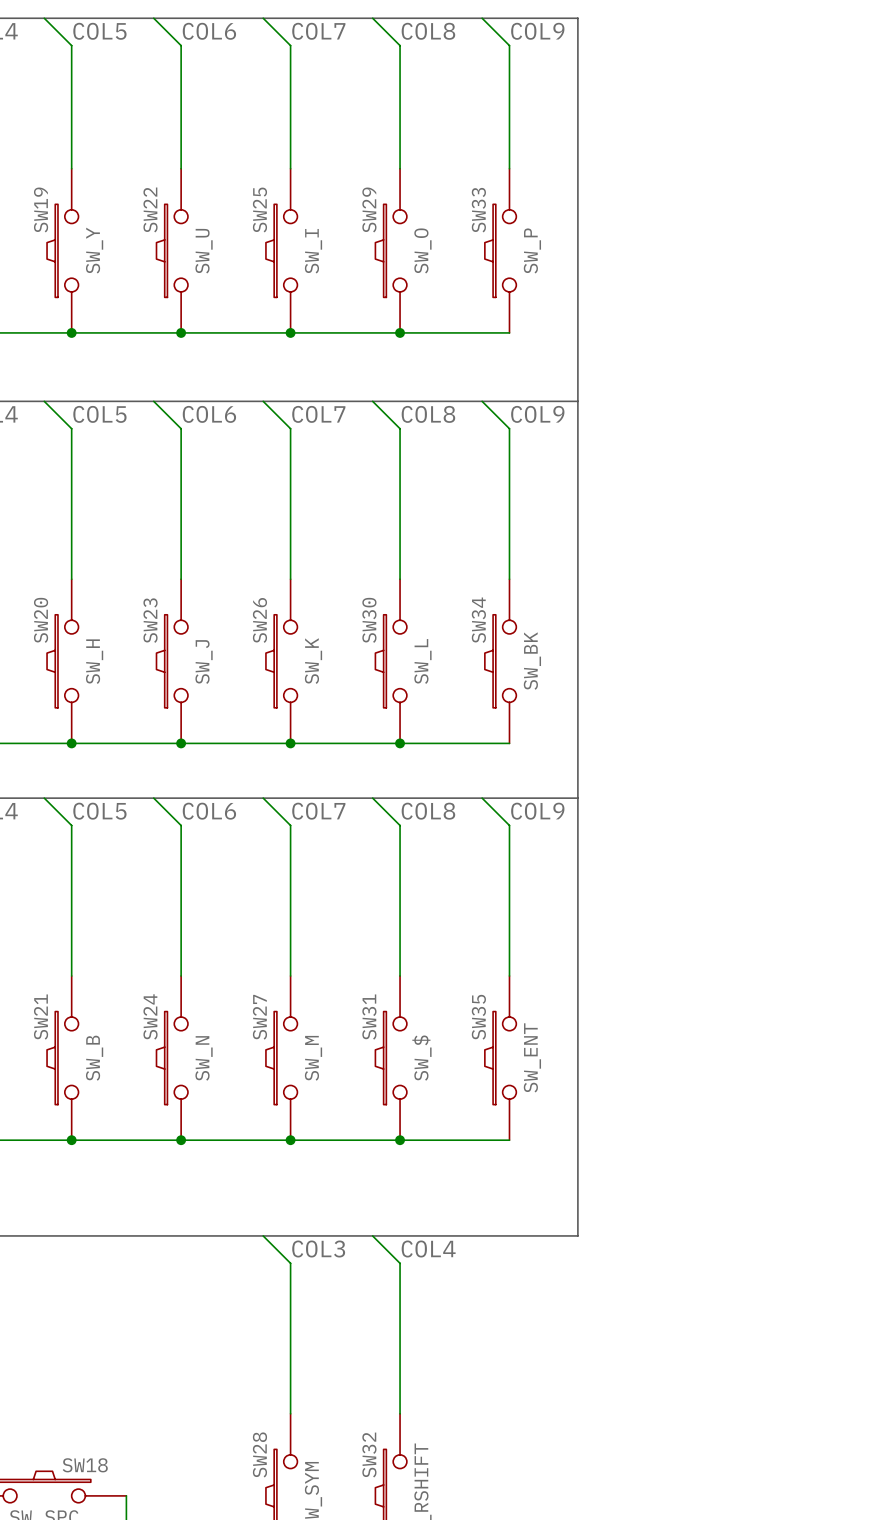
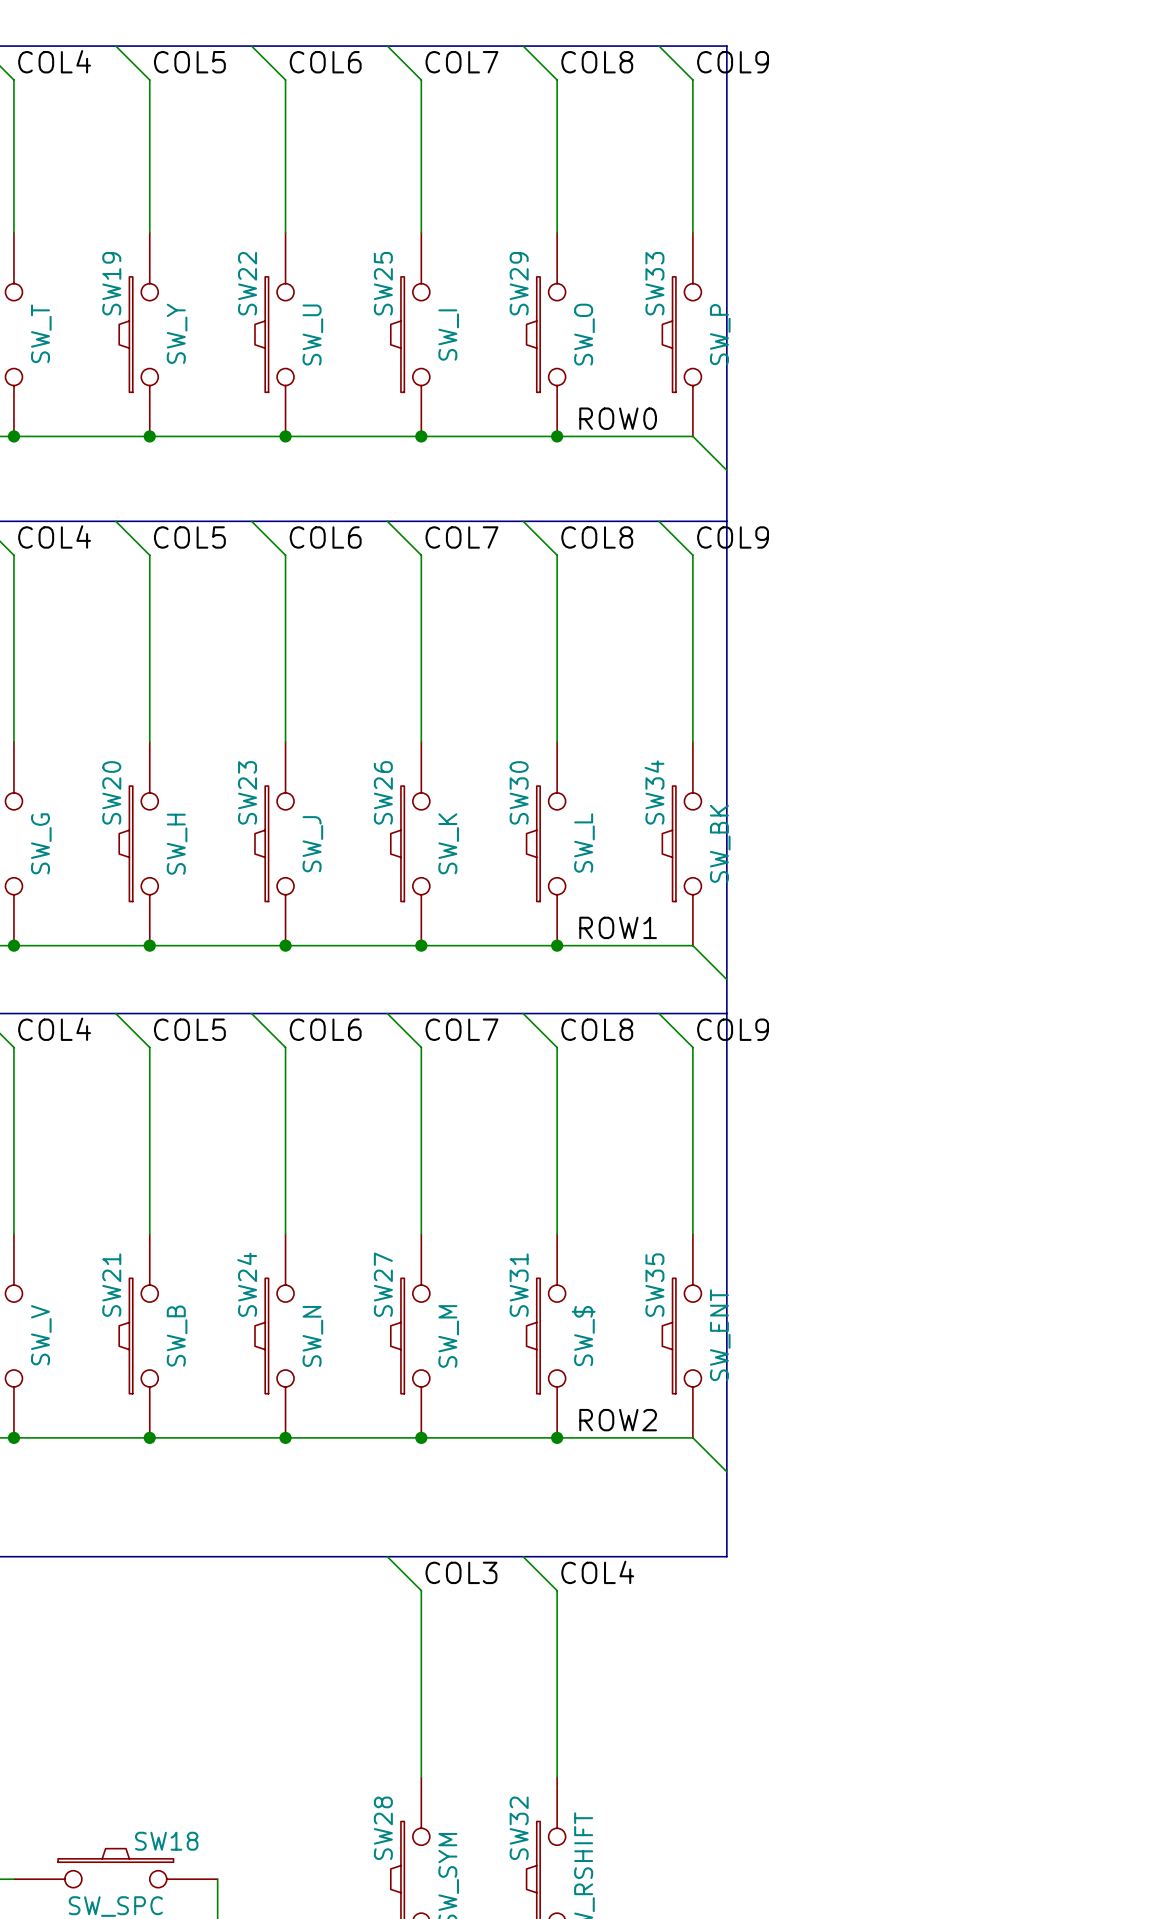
bus: (536, 18) (577, 18) (577, 1235) (536, 1235) -> (726, 46) (726, 1556)
label: none -> ROW0 (618, 418)
wire: none -> (692, 436) (726, 470)
bus: (536, 401) (577, 401) -> none
label: none -> ROW1 (618, 927)
wire: none -> (692, 945) (726, 979)
bus: (536, 798) (577, 798) -> none
label: none -> ROW2 (618, 1420)
wire: none -> (692, 1437) (726, 1471)

